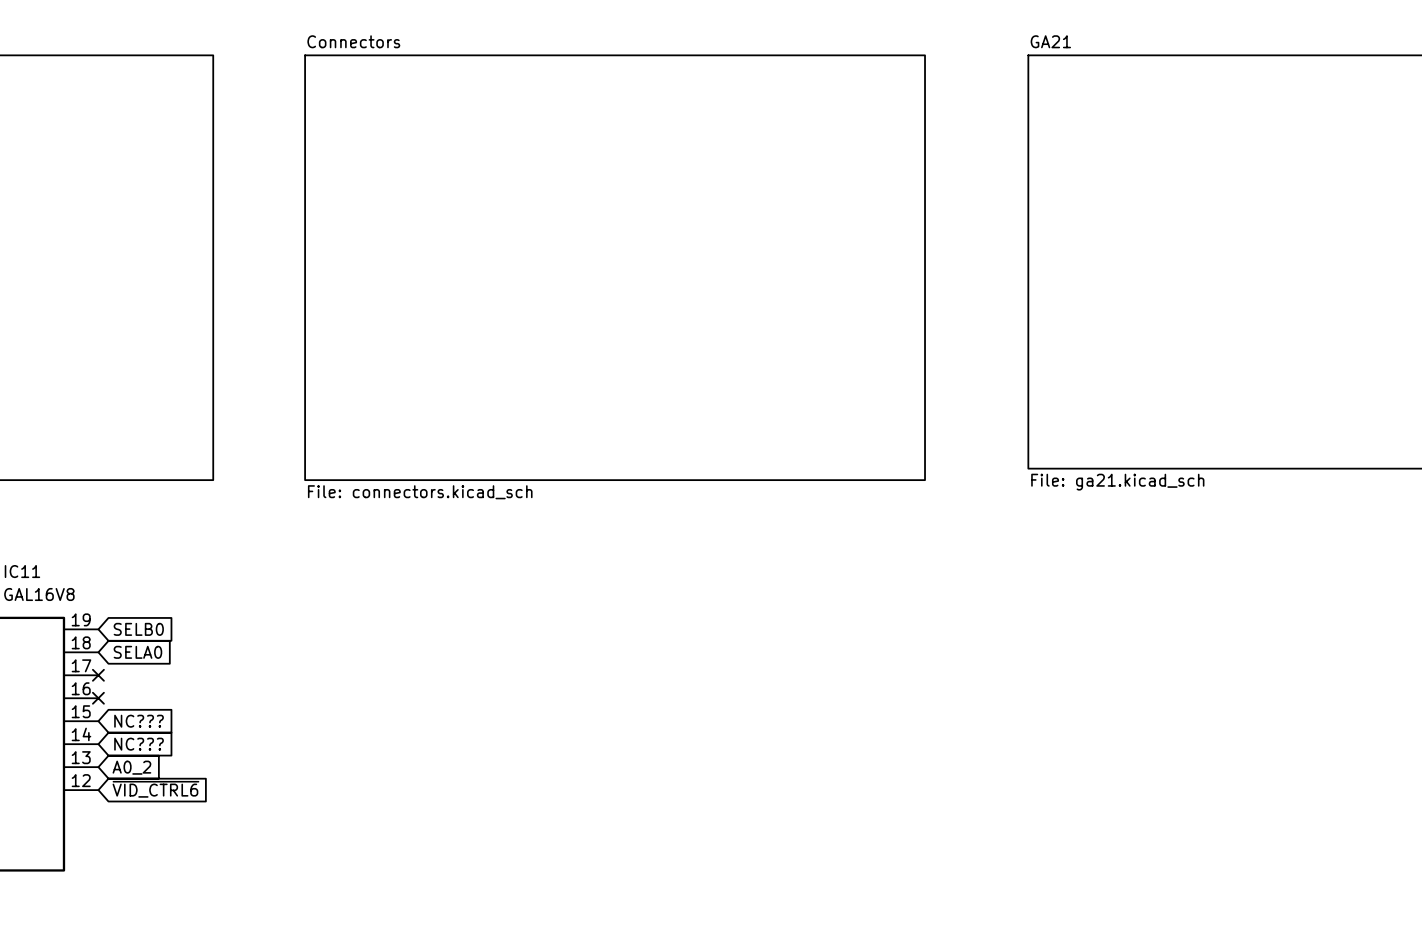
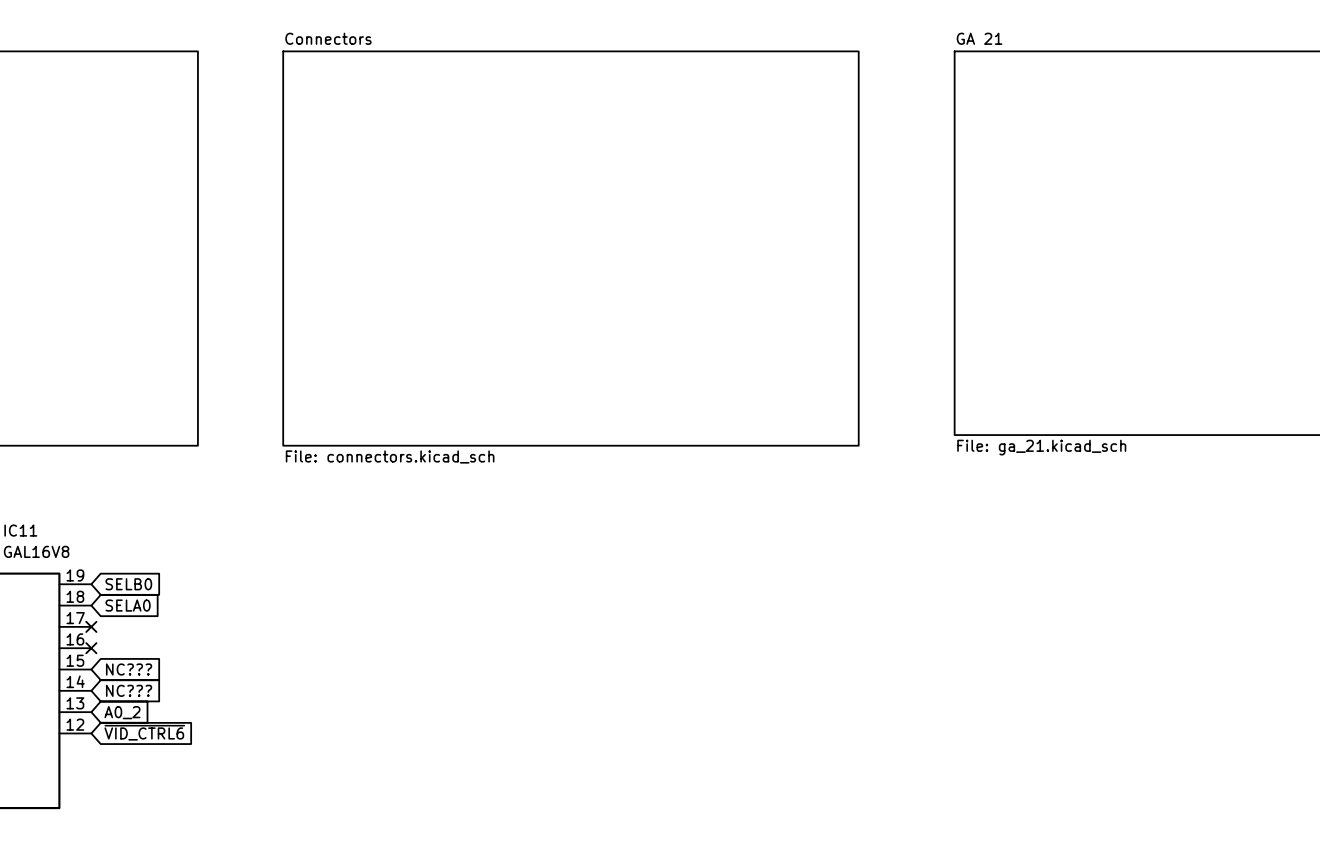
sheet GA21 name: GA21 (1050, 41) -> GA 21 (979, 38)
sheet GA21 value: File: ga21.kicad_sch (1117, 482) -> File: ga_21.kicad_sch (1041, 447)

